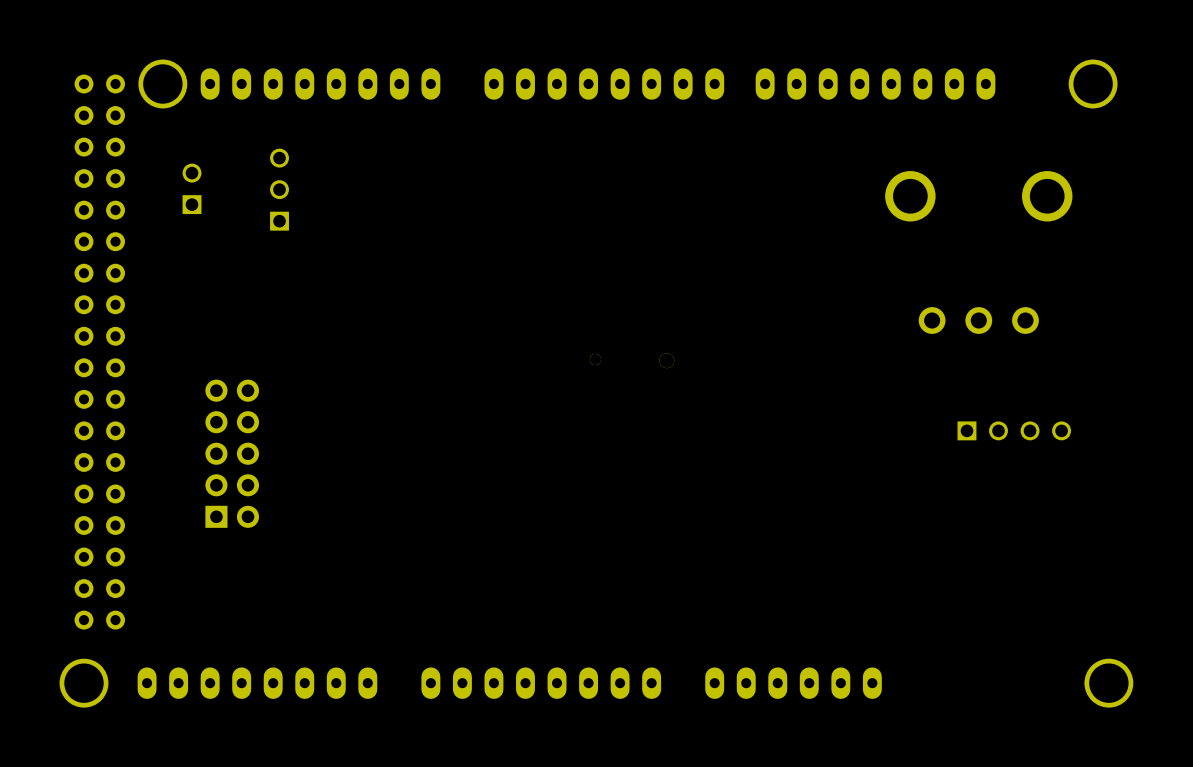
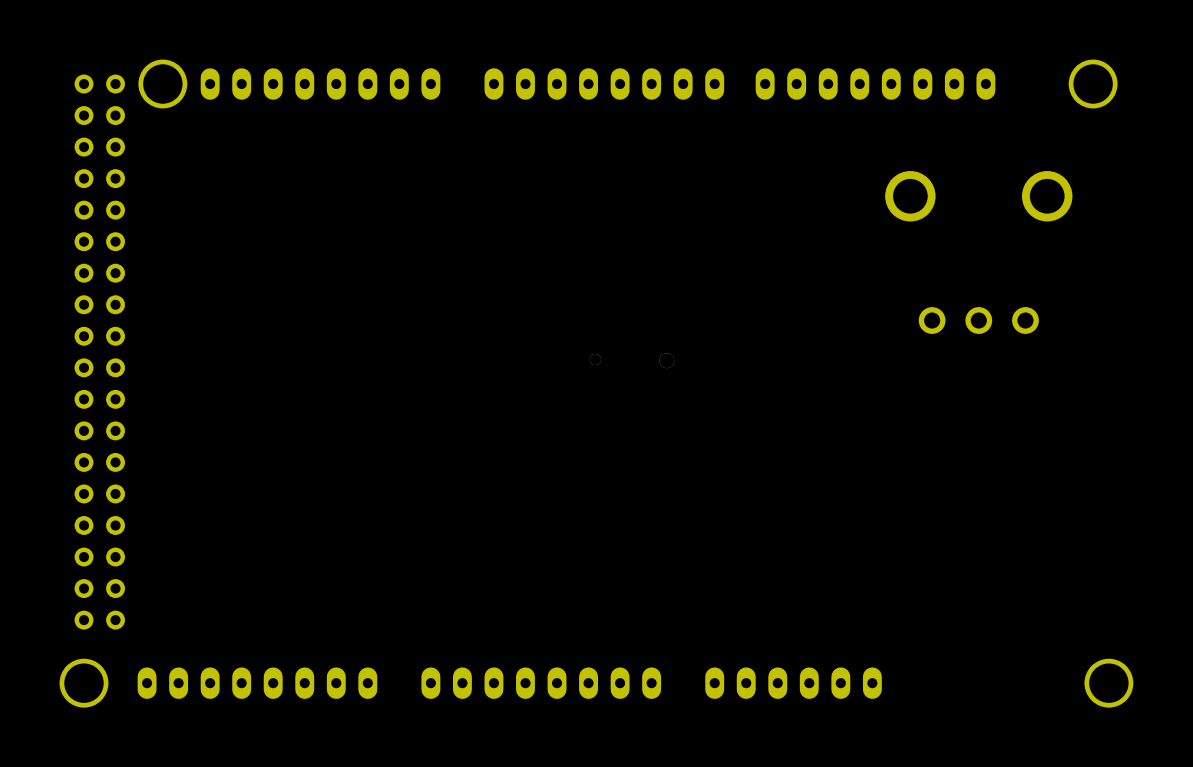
part: (192, 188) -> none
part: (279, 189) -> none
part: (1014, 430) -> none
part: (232, 453) -> none

